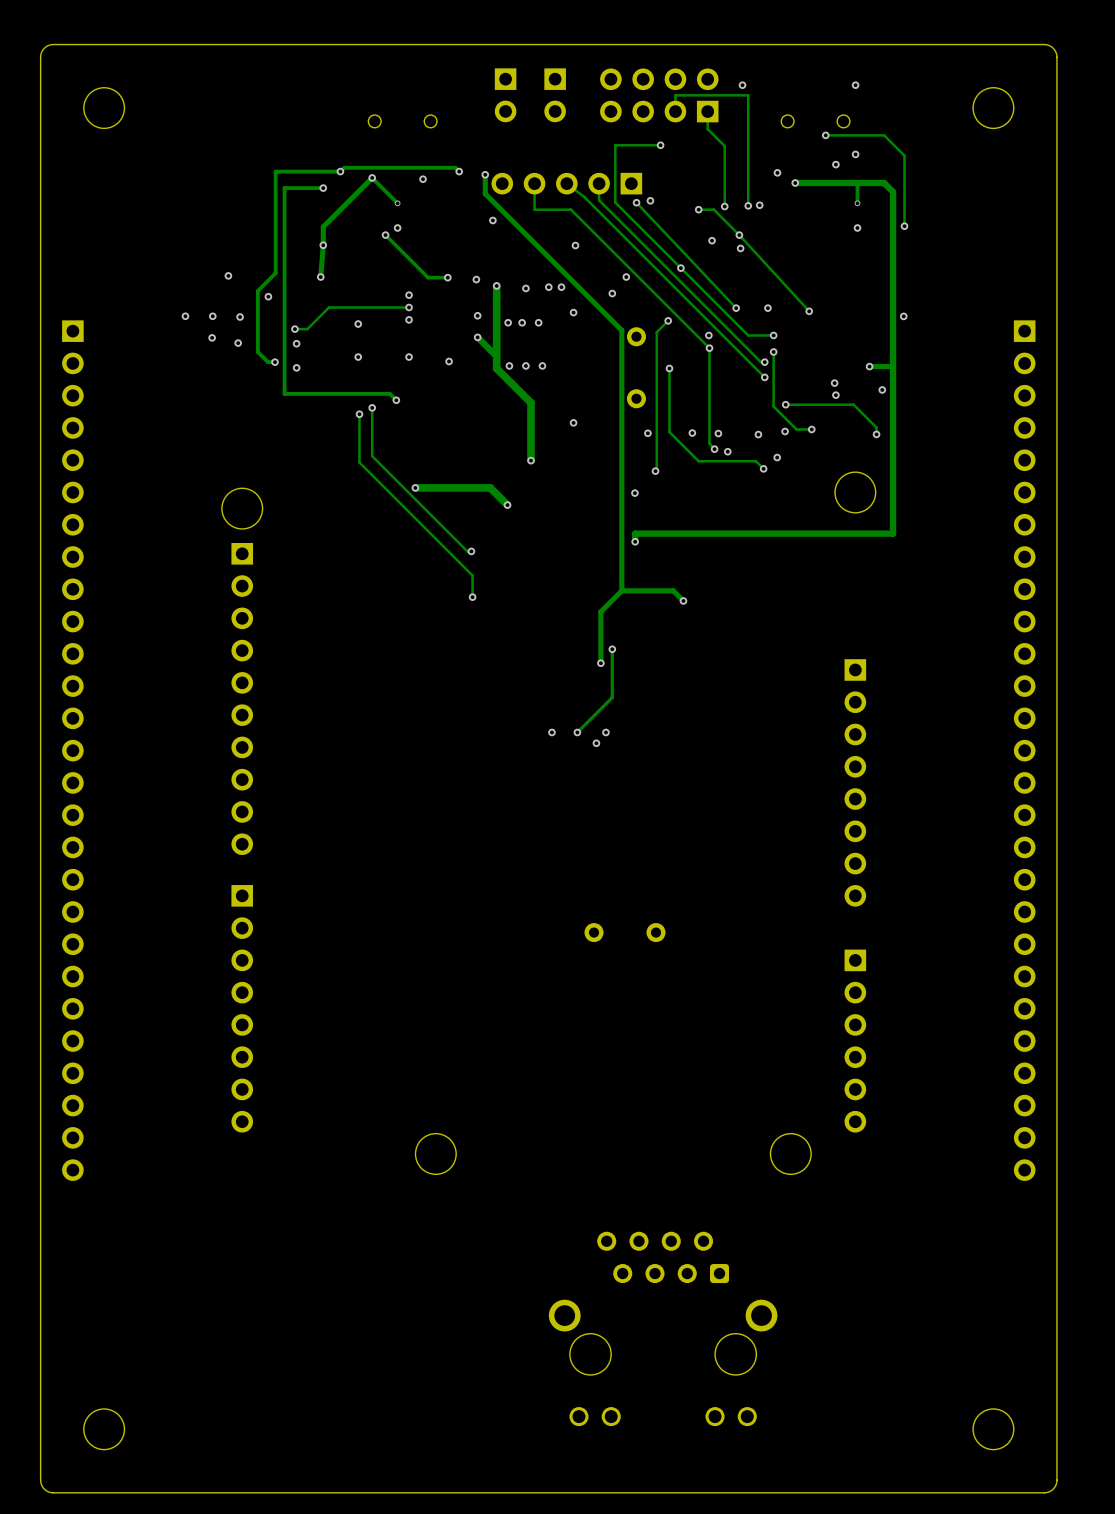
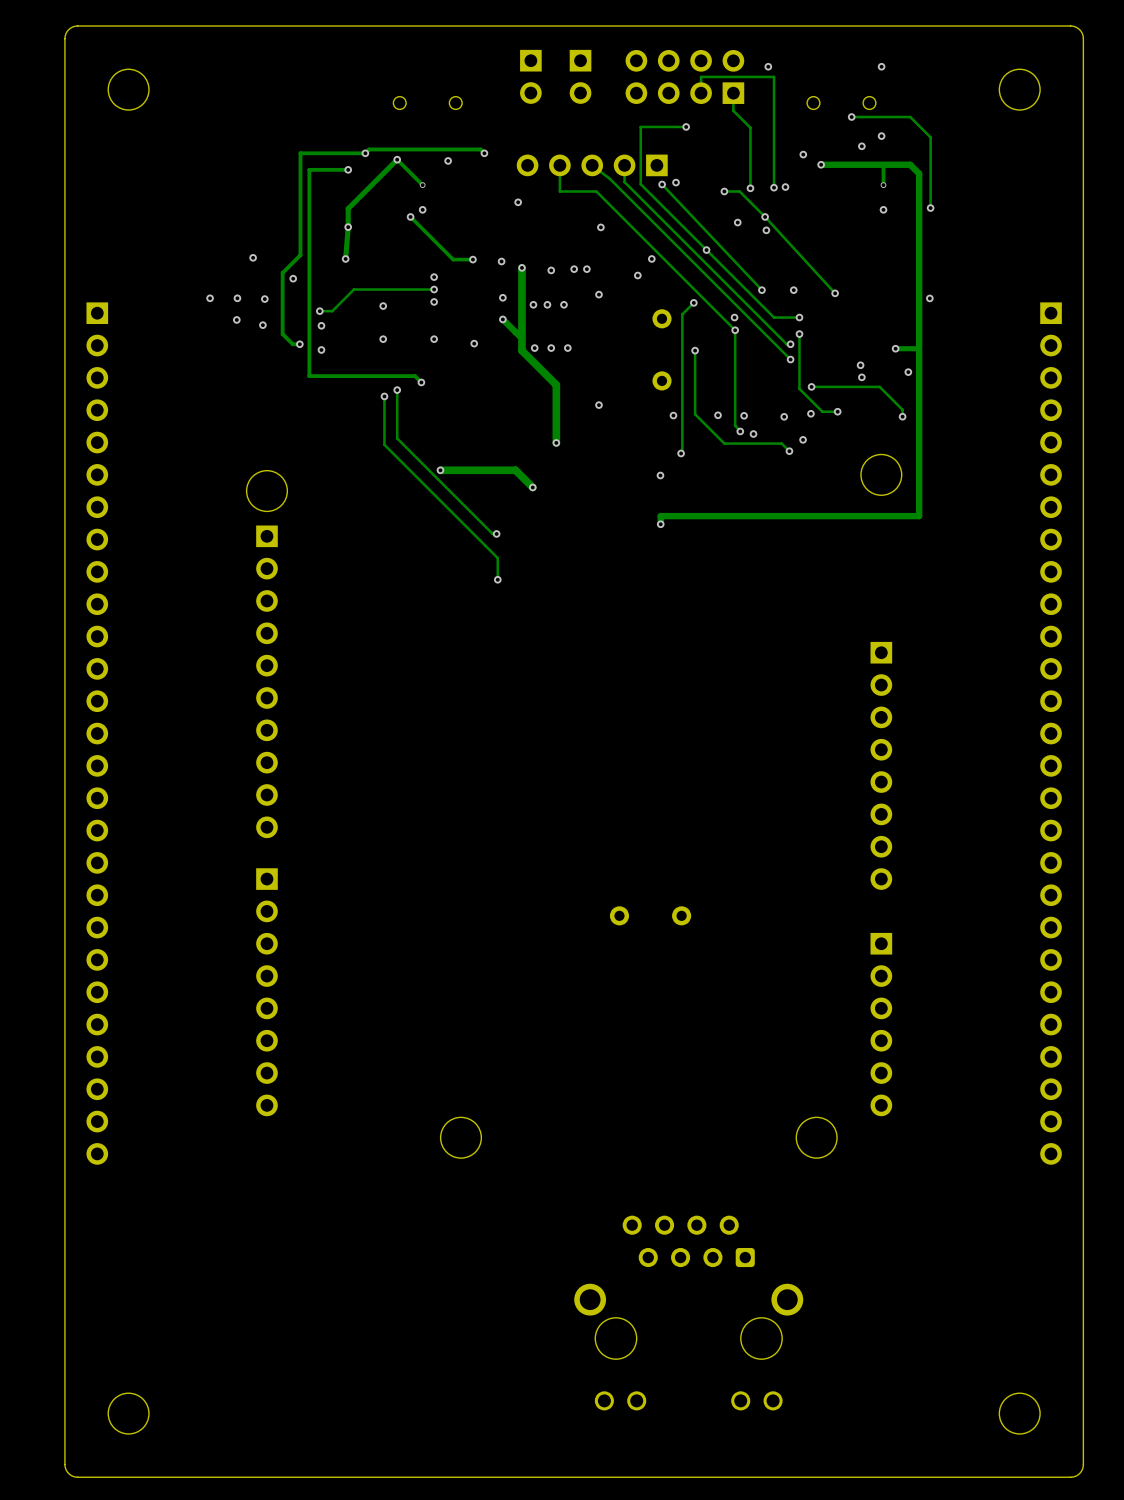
track: (485, 174) (485, 193) (621, 330) (621, 590) -> none
via: (485, 174) -> none
track: (621, 590) (673, 590) (683, 600) -> none
track: (621, 590) (600, 611) (600, 663) -> none
via: (683, 600) -> none
track: (612, 649) (612, 697) (577, 732) -> none
via: (612, 649) -> none
via: (600, 663) -> none
via: (551, 732) -> none
via: (577, 732) -> none
via: (605, 732) -> none
via: (596, 743) -> none

